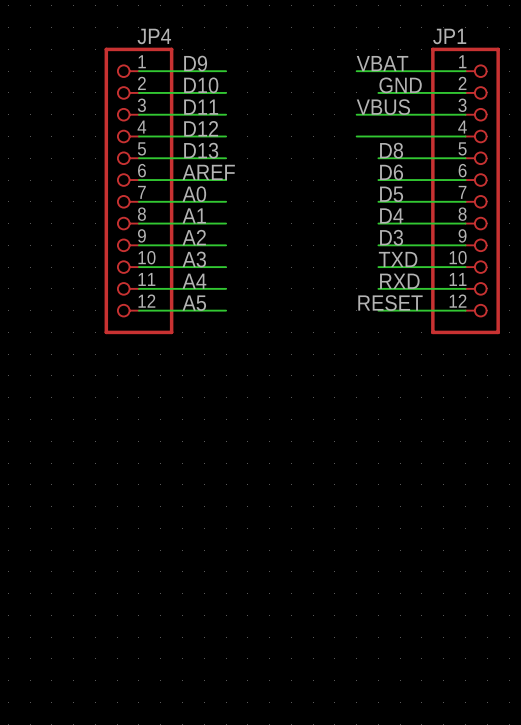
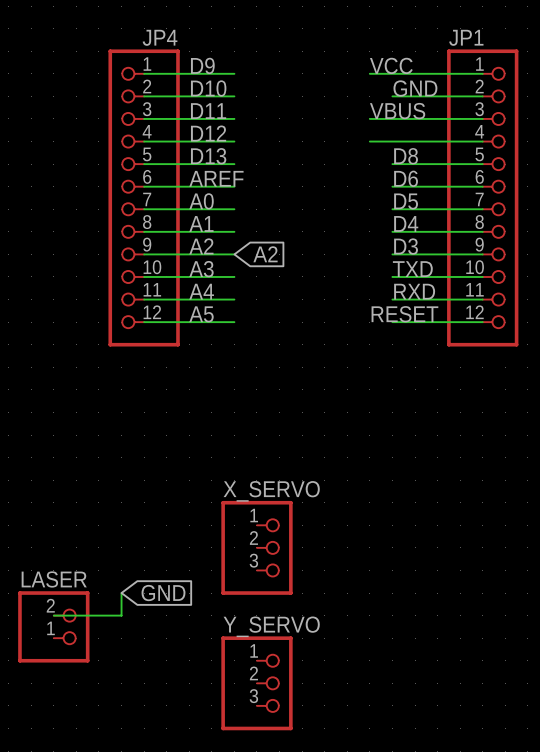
label: VBAT (382, 63) -> VCC (391, 65)
global label: none -> A2 (265, 254)
X_SERVO: none -> (256, 547)
wire: none -> (121, 593) (121, 615) (53, 615)
global label: none -> GND (163, 593)
LASER: none -> (53, 626)
Y_SERVO: none -> (256, 683)

